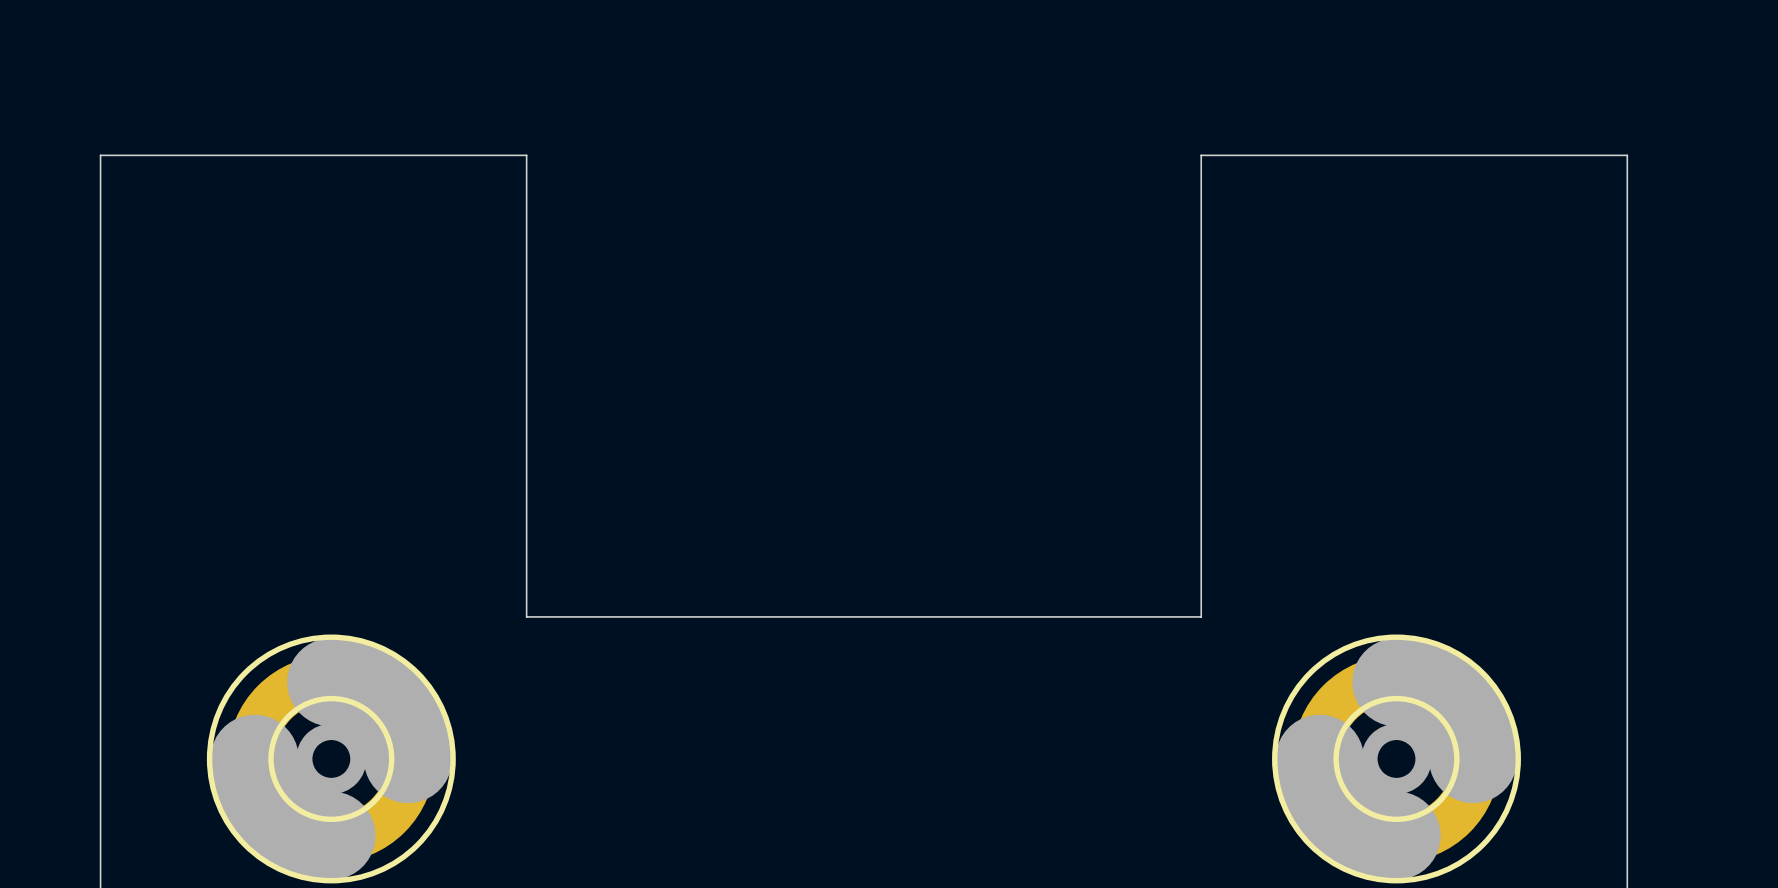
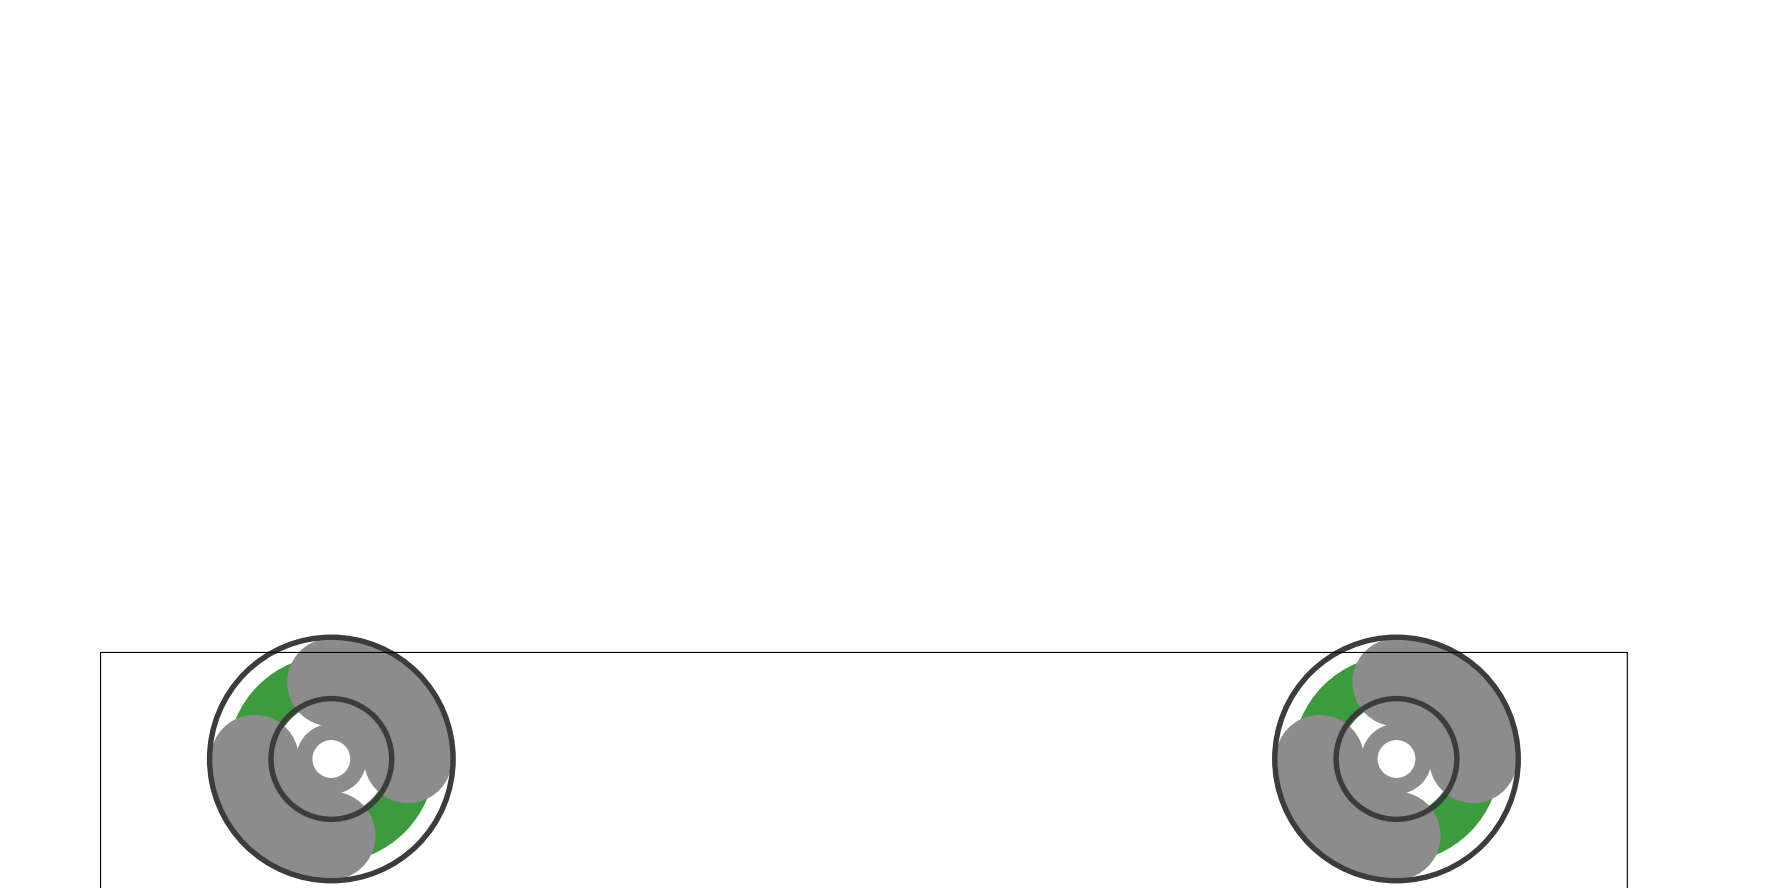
board edge: (100, 652) (100, 155) (526, 155) (526, 616) (1201, 616) (1201, 155) (1627, 155) (1627, 652) -> (100, 652) (1627, 652)

